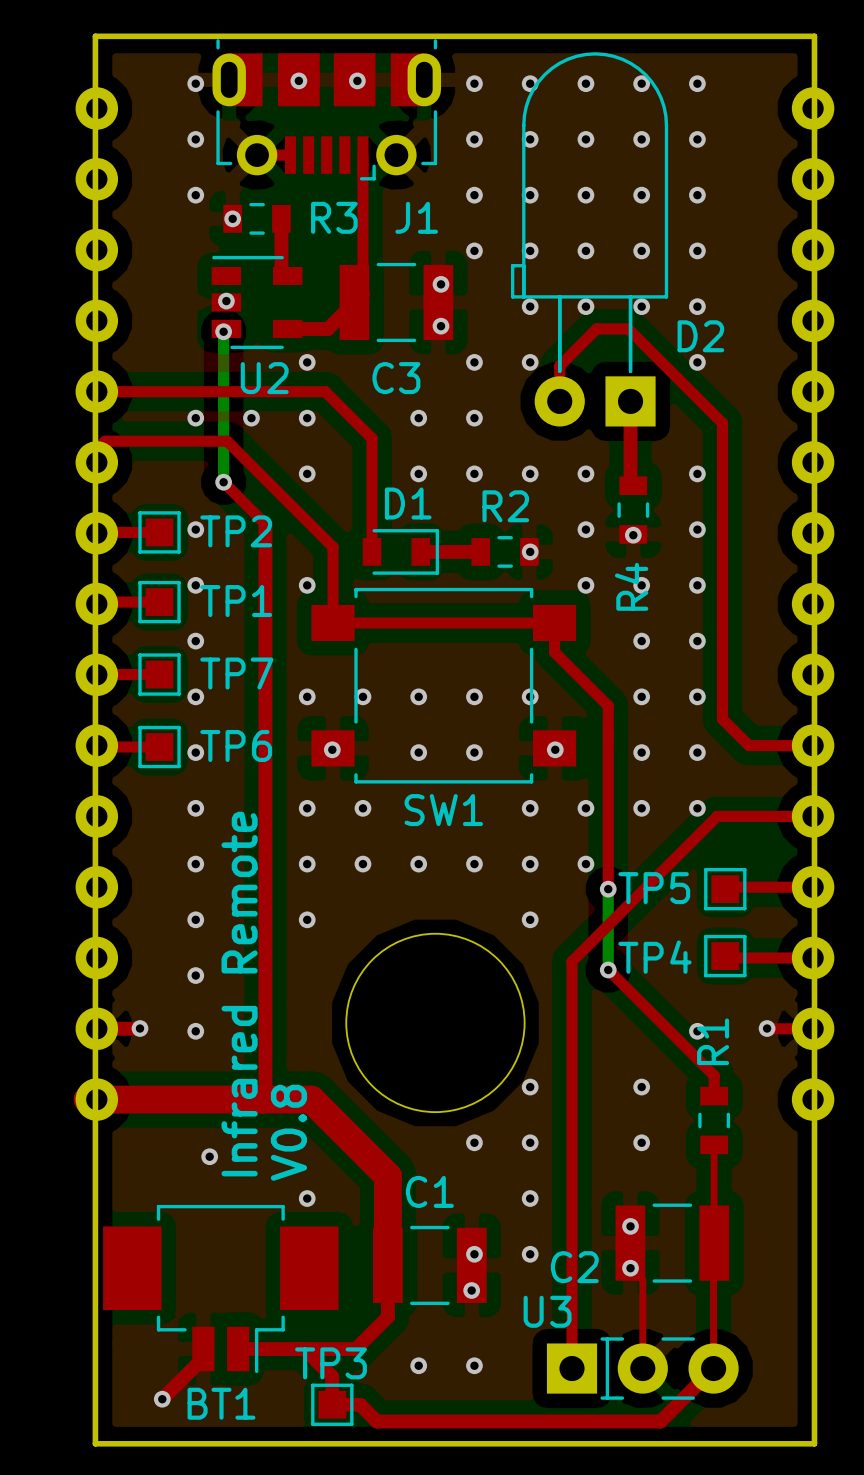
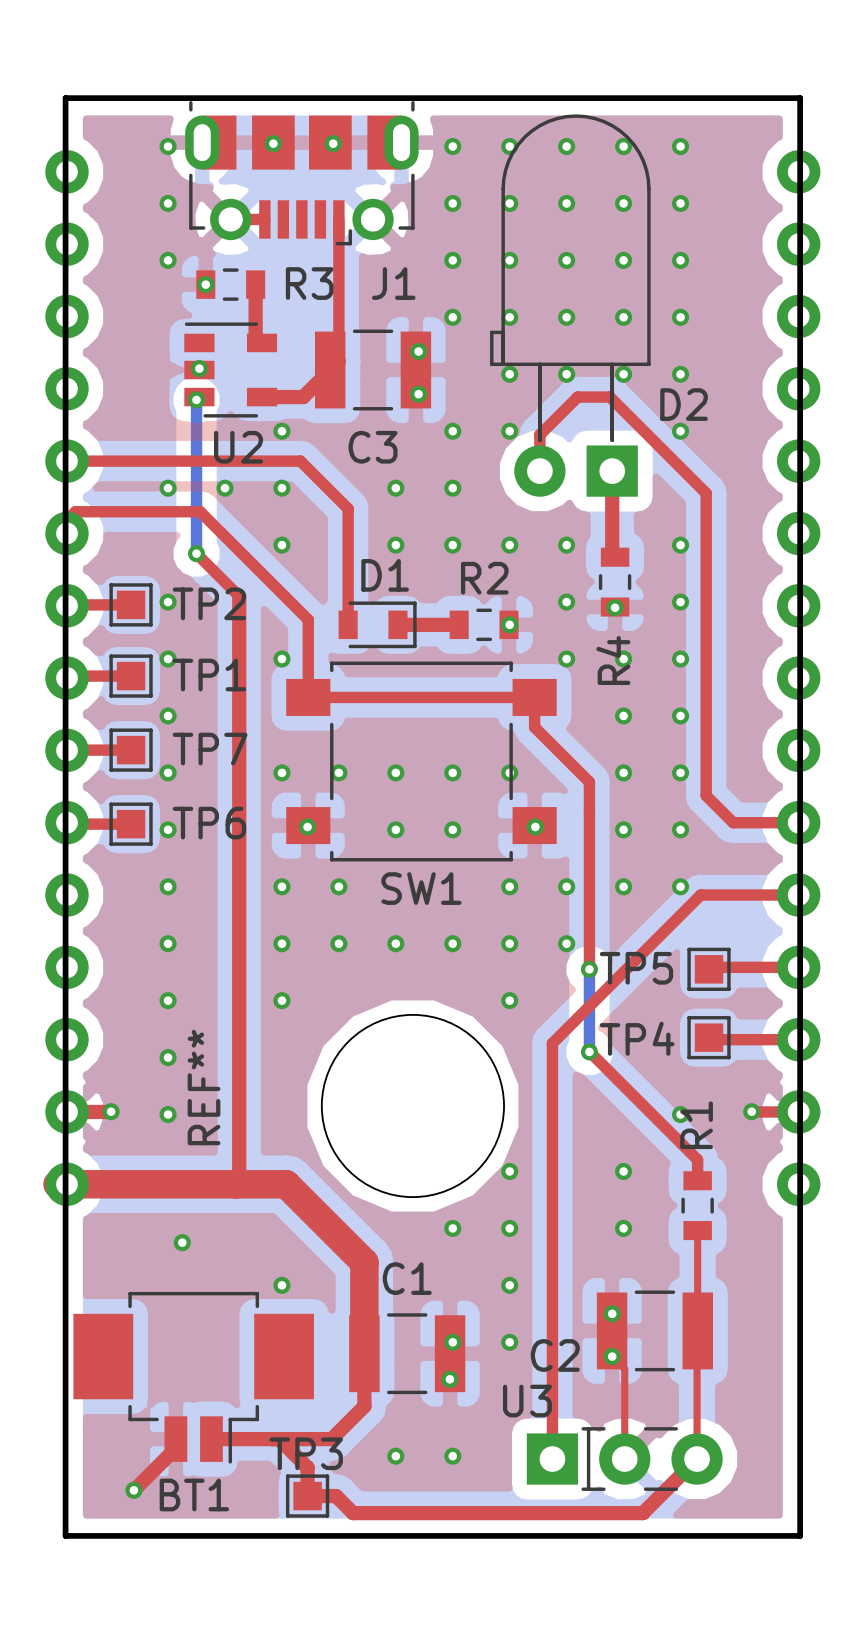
text: Infrared Remote (239, 994) -> none
REF** name: none -> REF** (204, 1087)
text: V0.8 (288, 1132) -> none

